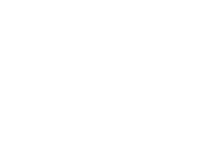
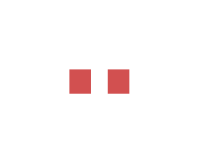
part: none -> (99, 81)

